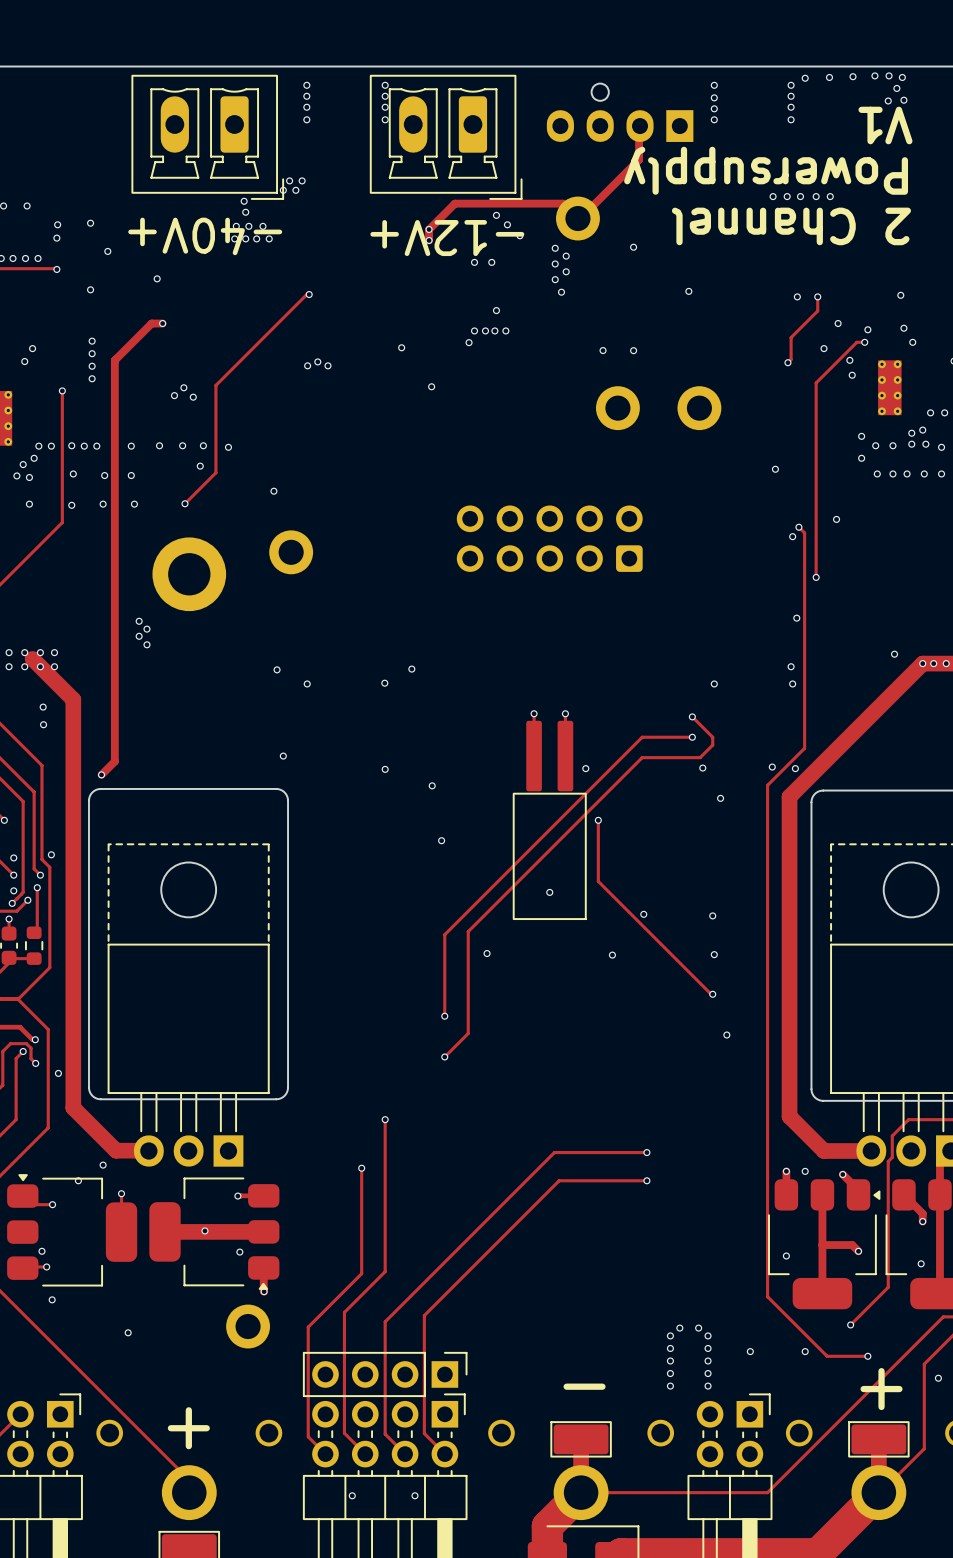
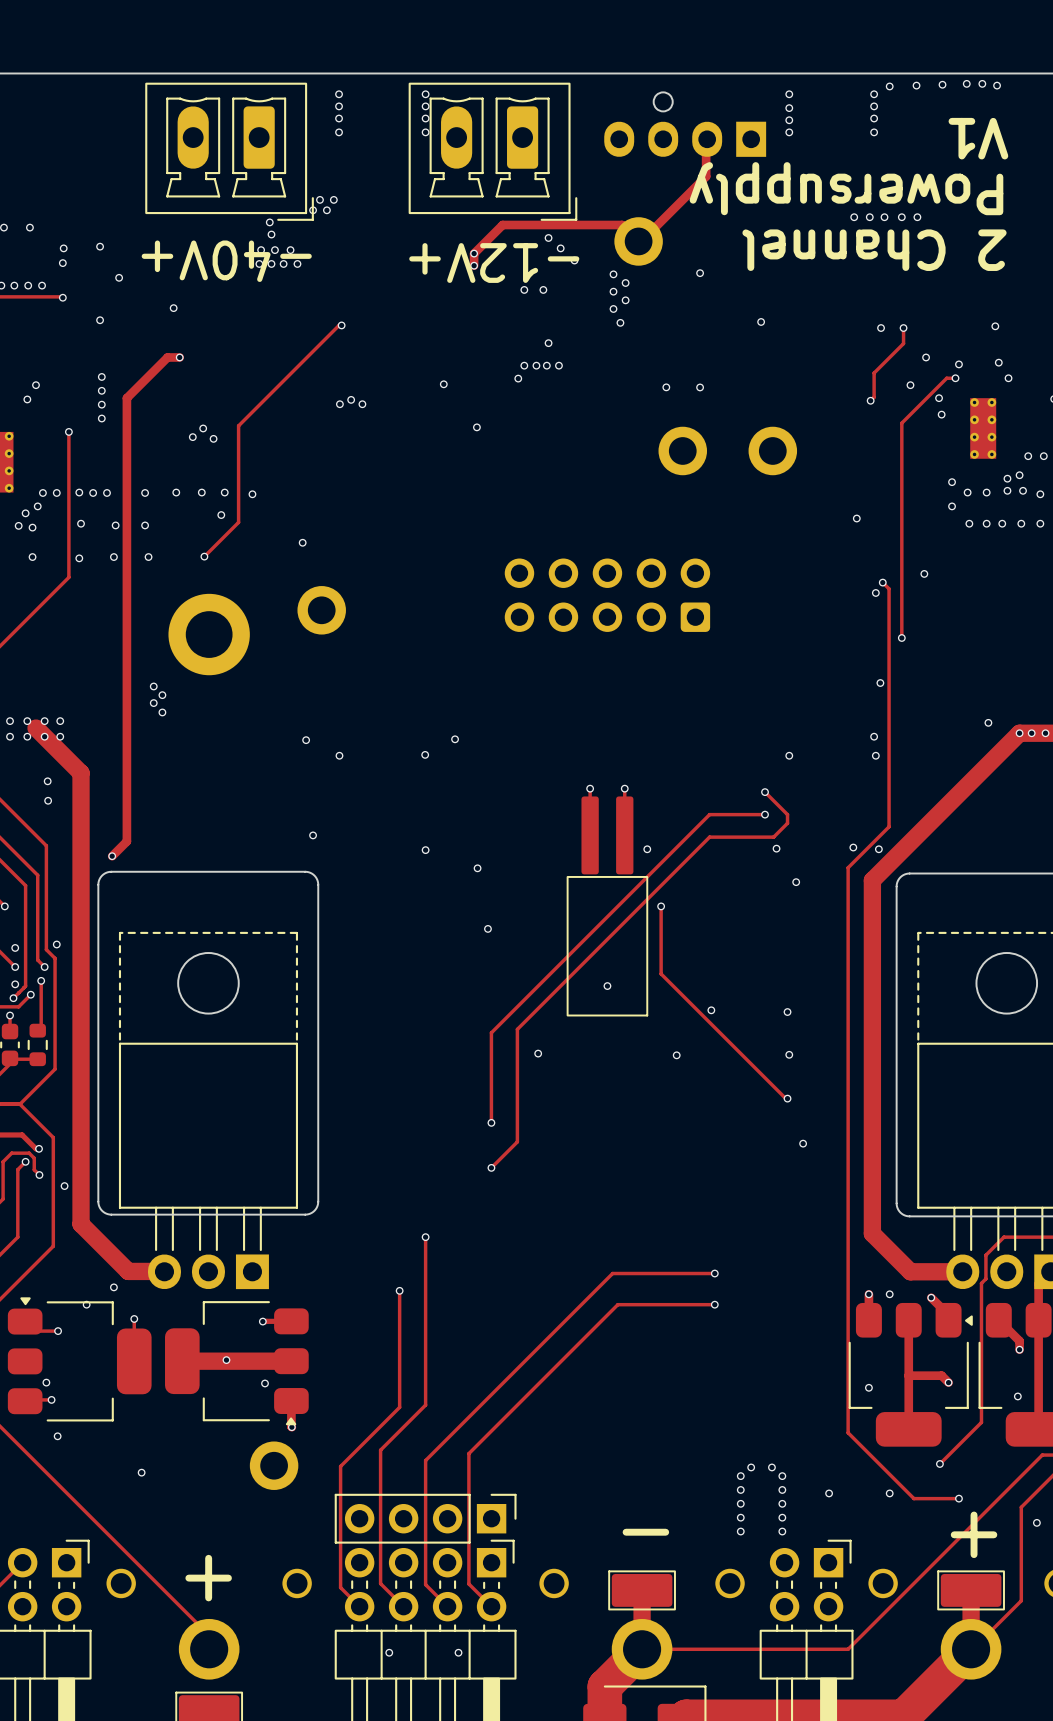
via: (896, 88) -> none
via: (888, 100) -> none
via: (903, 100) -> none

